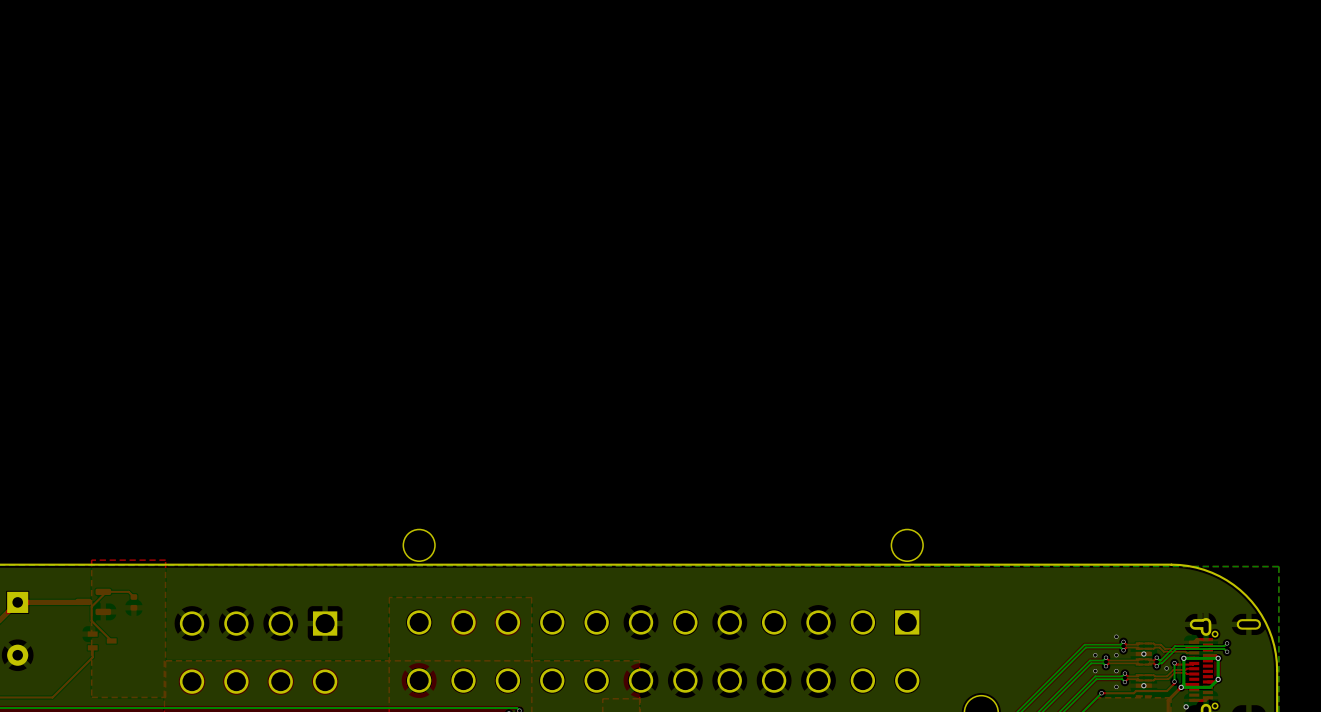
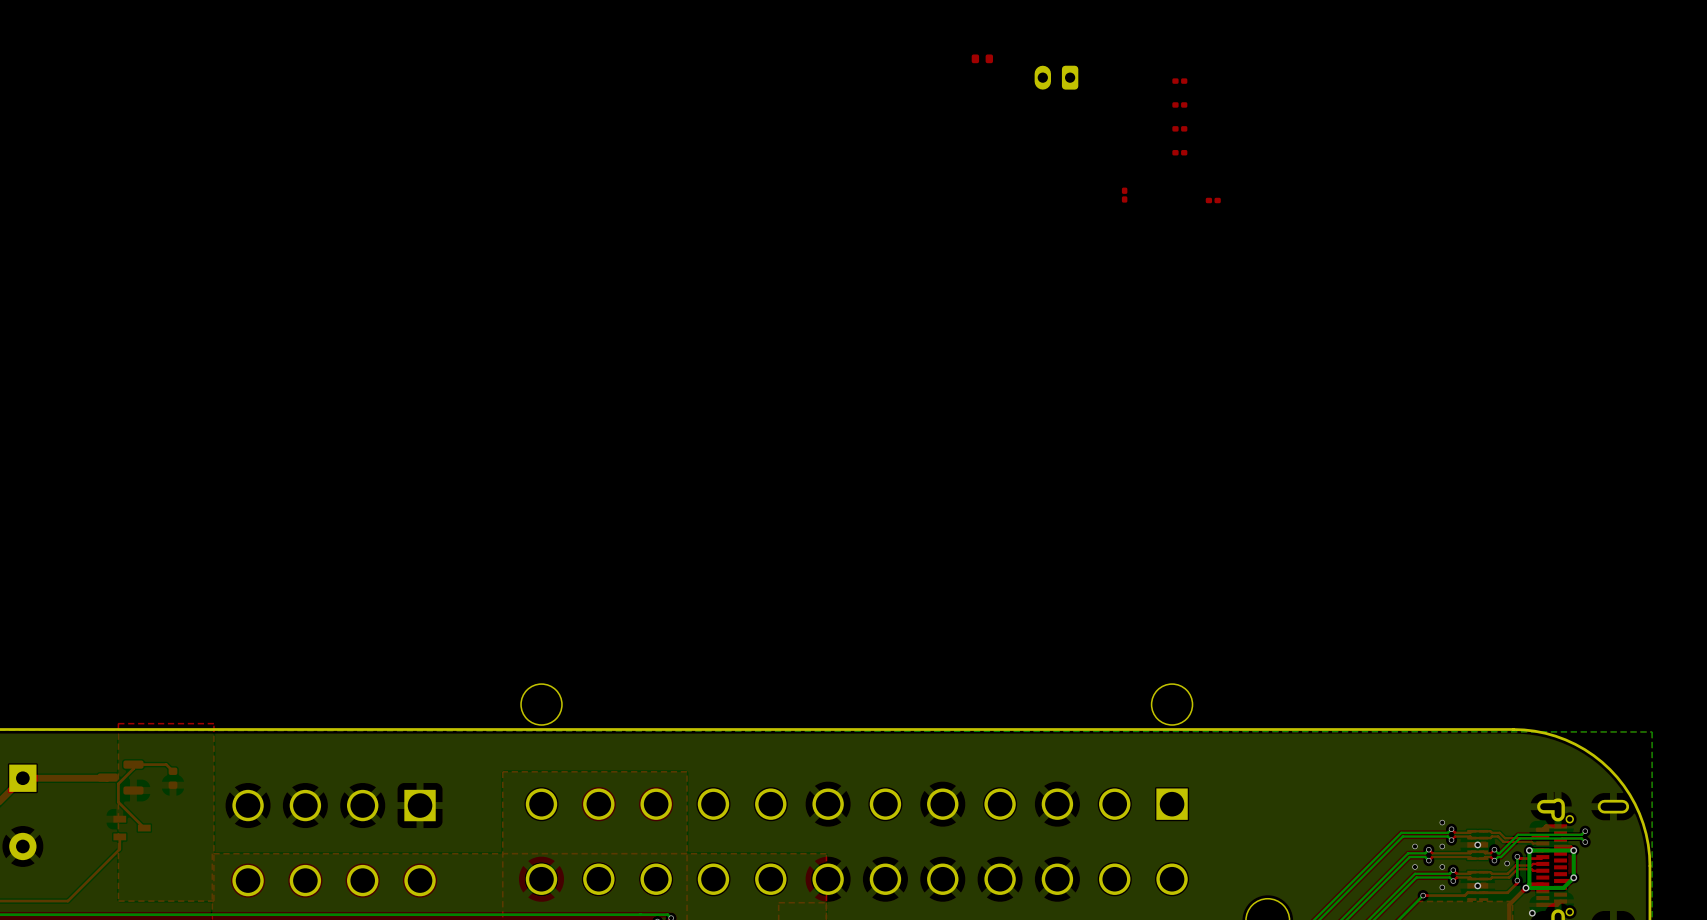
part: none -> (982, 58)
part: none -> (1056, 77)
part: none -> (1179, 81)
part: none -> (1179, 104)
part: none -> (1179, 128)
part: none -> (1179, 152)
part: none -> (1124, 195)
part: none -> (1213, 200)

